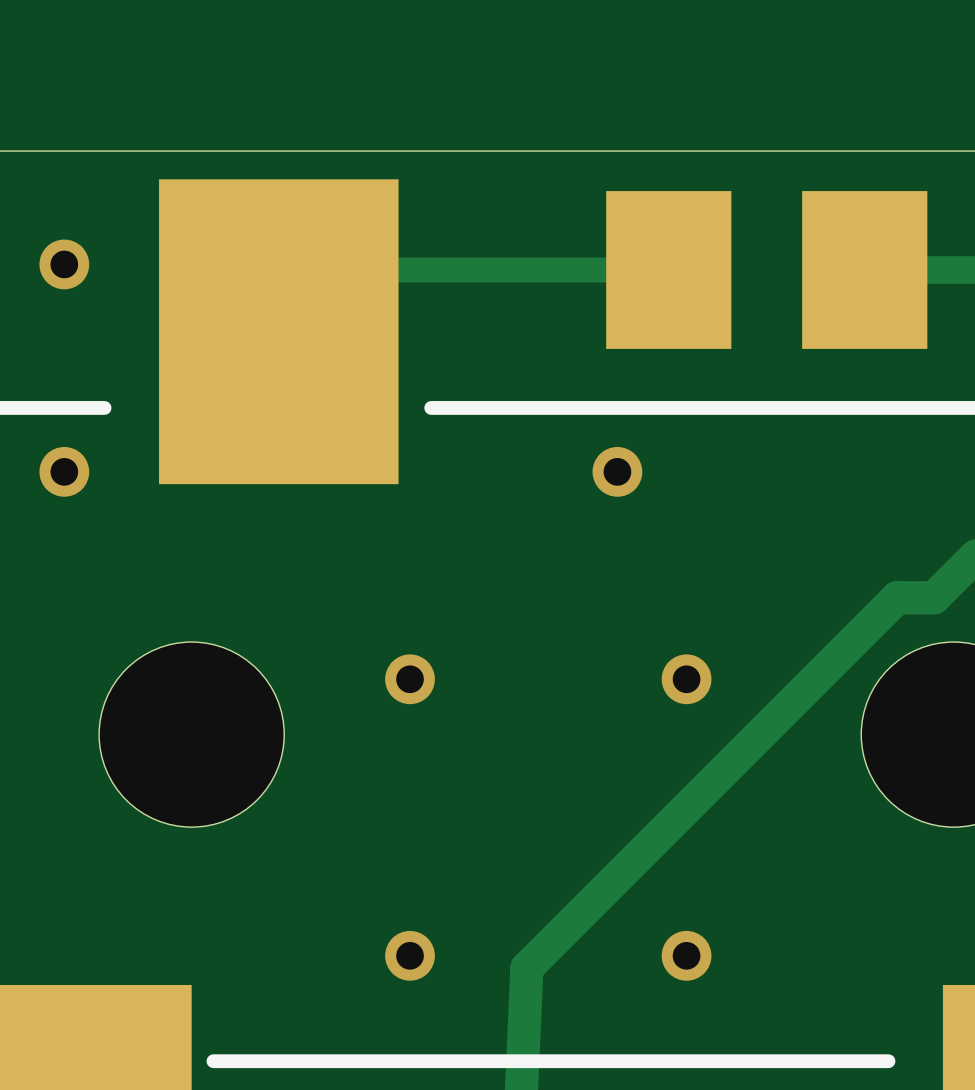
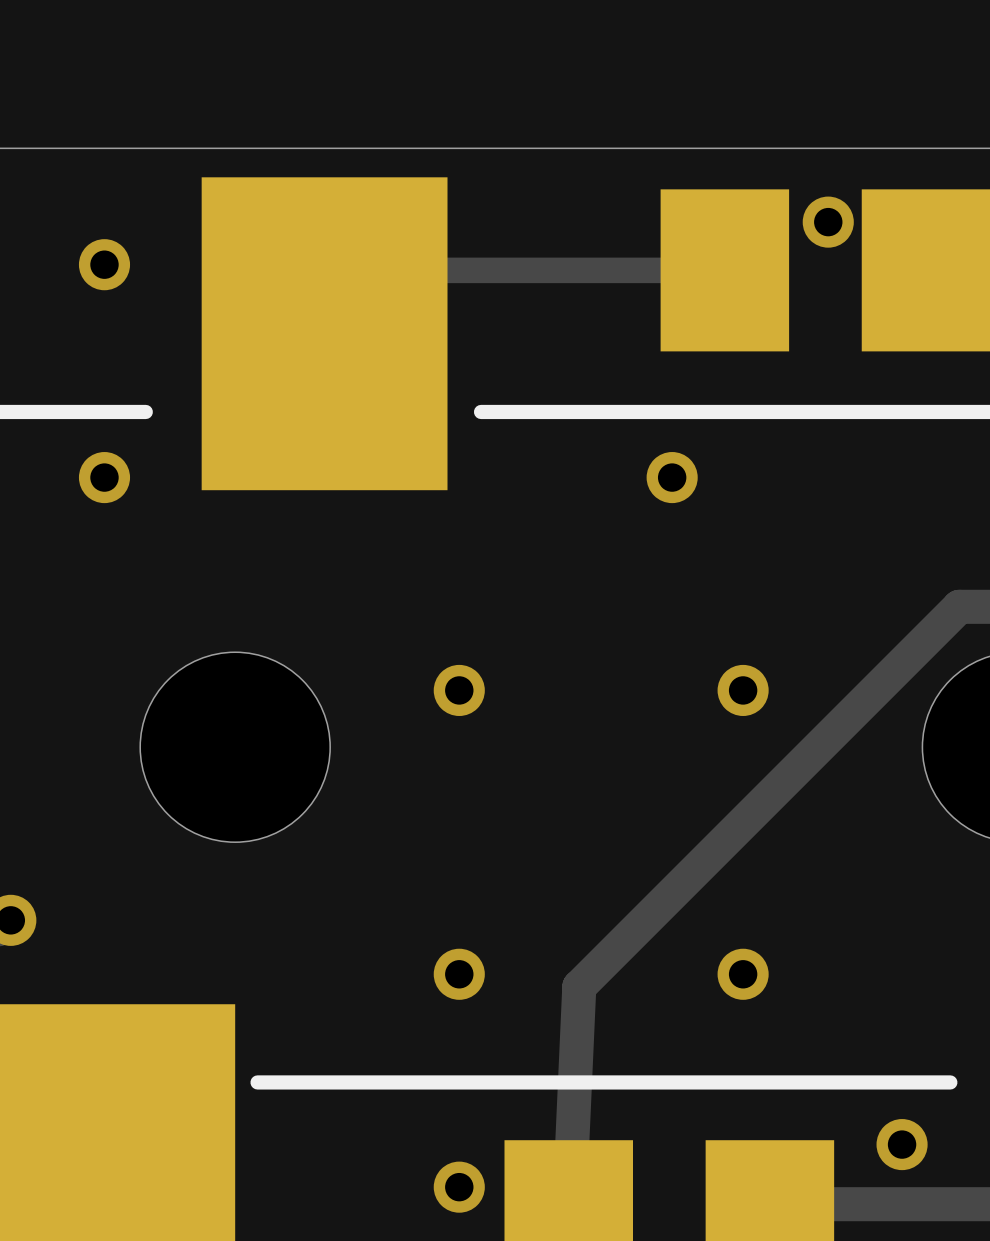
via: none -> (828, 222)

